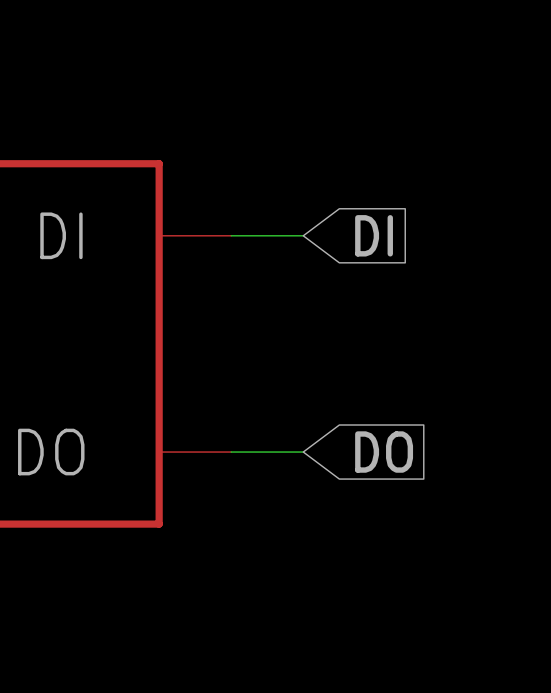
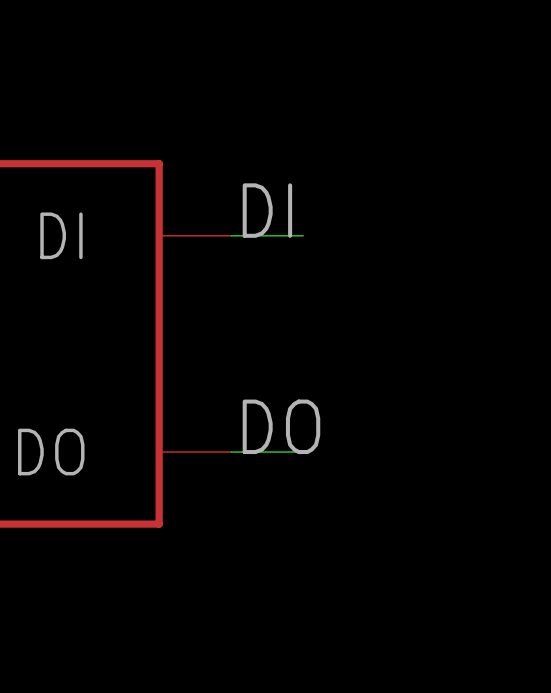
label: none -> DI (267, 210)
global label: DI (374, 235) -> none
label: none -> DO (281, 426)
global label: DO (384, 452) -> none

